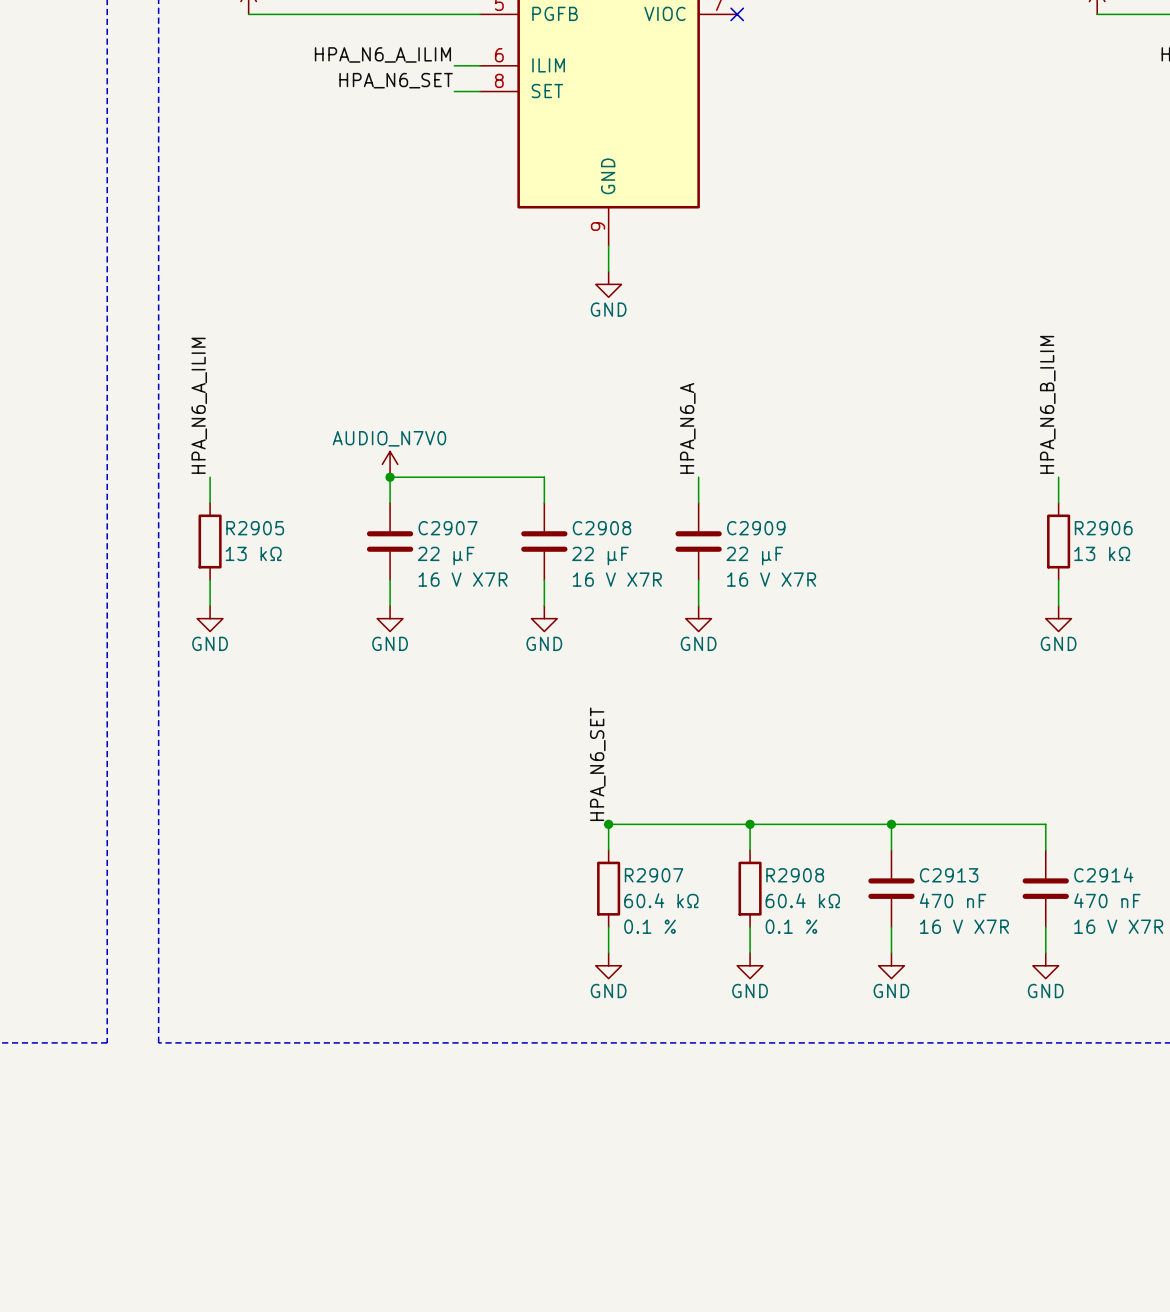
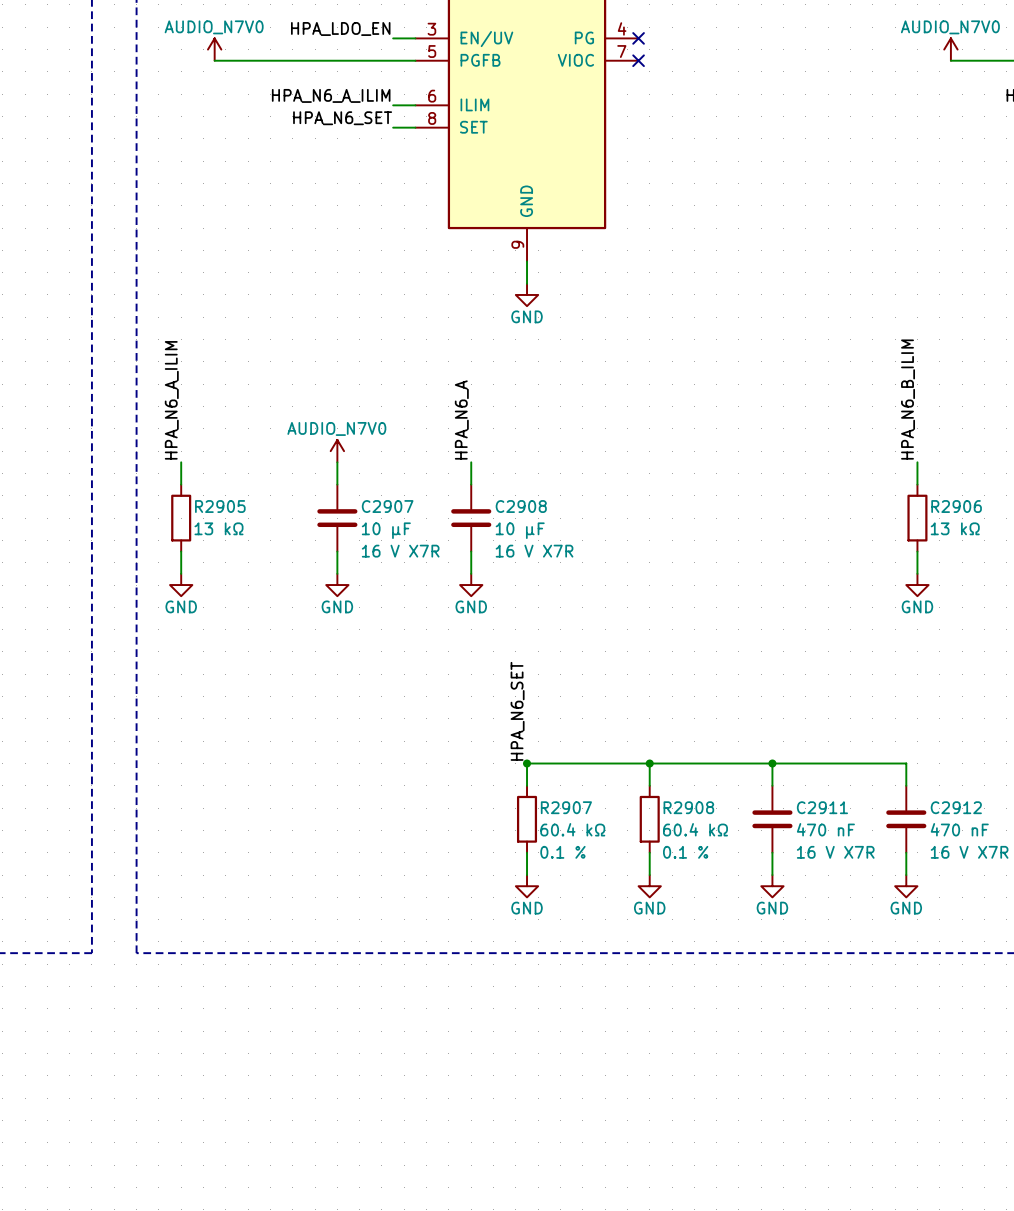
label position: HPA_N6_A (687, 428) -> HPA_N6_A (461, 420)
wire: (390, 477) (544, 477) -> none
junction: (390, 477) -> none
wire: (698, 477) (698, 502) -> none
C2909: 22 µF (698, 541) -> none
C2907 value: 22 µF (446, 556) -> 10 µF (386, 530)
C2908 value: 22 µF (600, 556) -> 10 µF (520, 530)
wire: (698, 580) (698, 605) -> none
power symbol: GND (698, 618) -> none
C2914 name: C2914 (1103, 874) -> C2912 (956, 807)
C2913 name: C2913 (949, 875) -> C2911 (822, 807)

